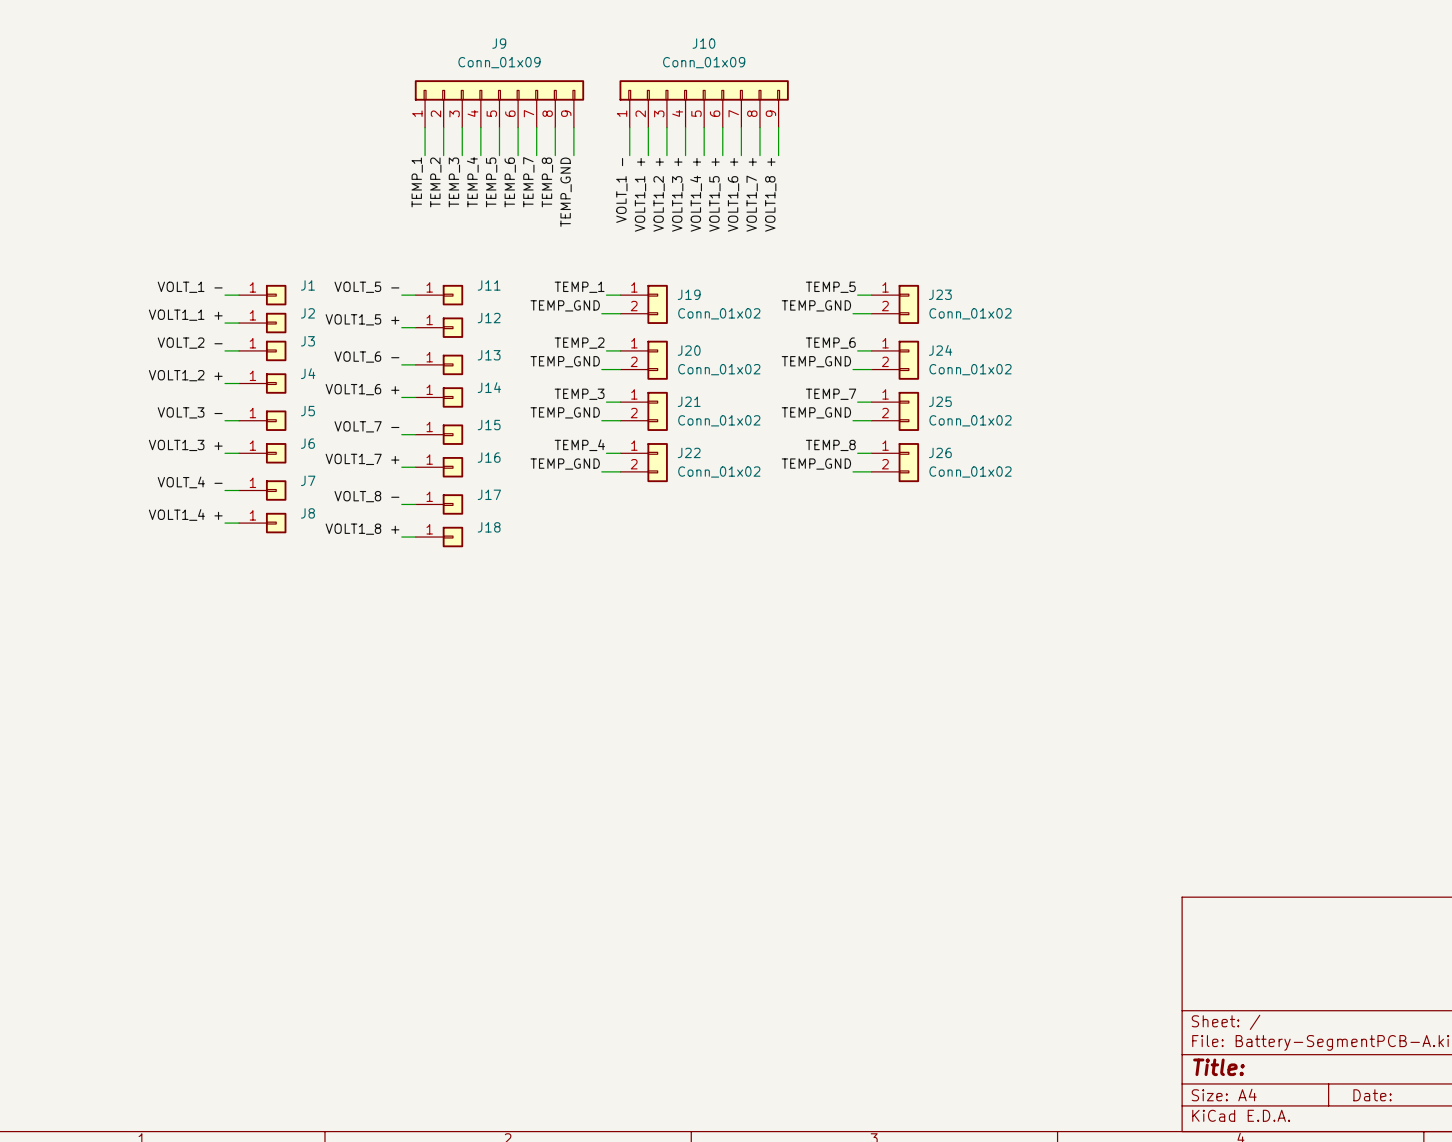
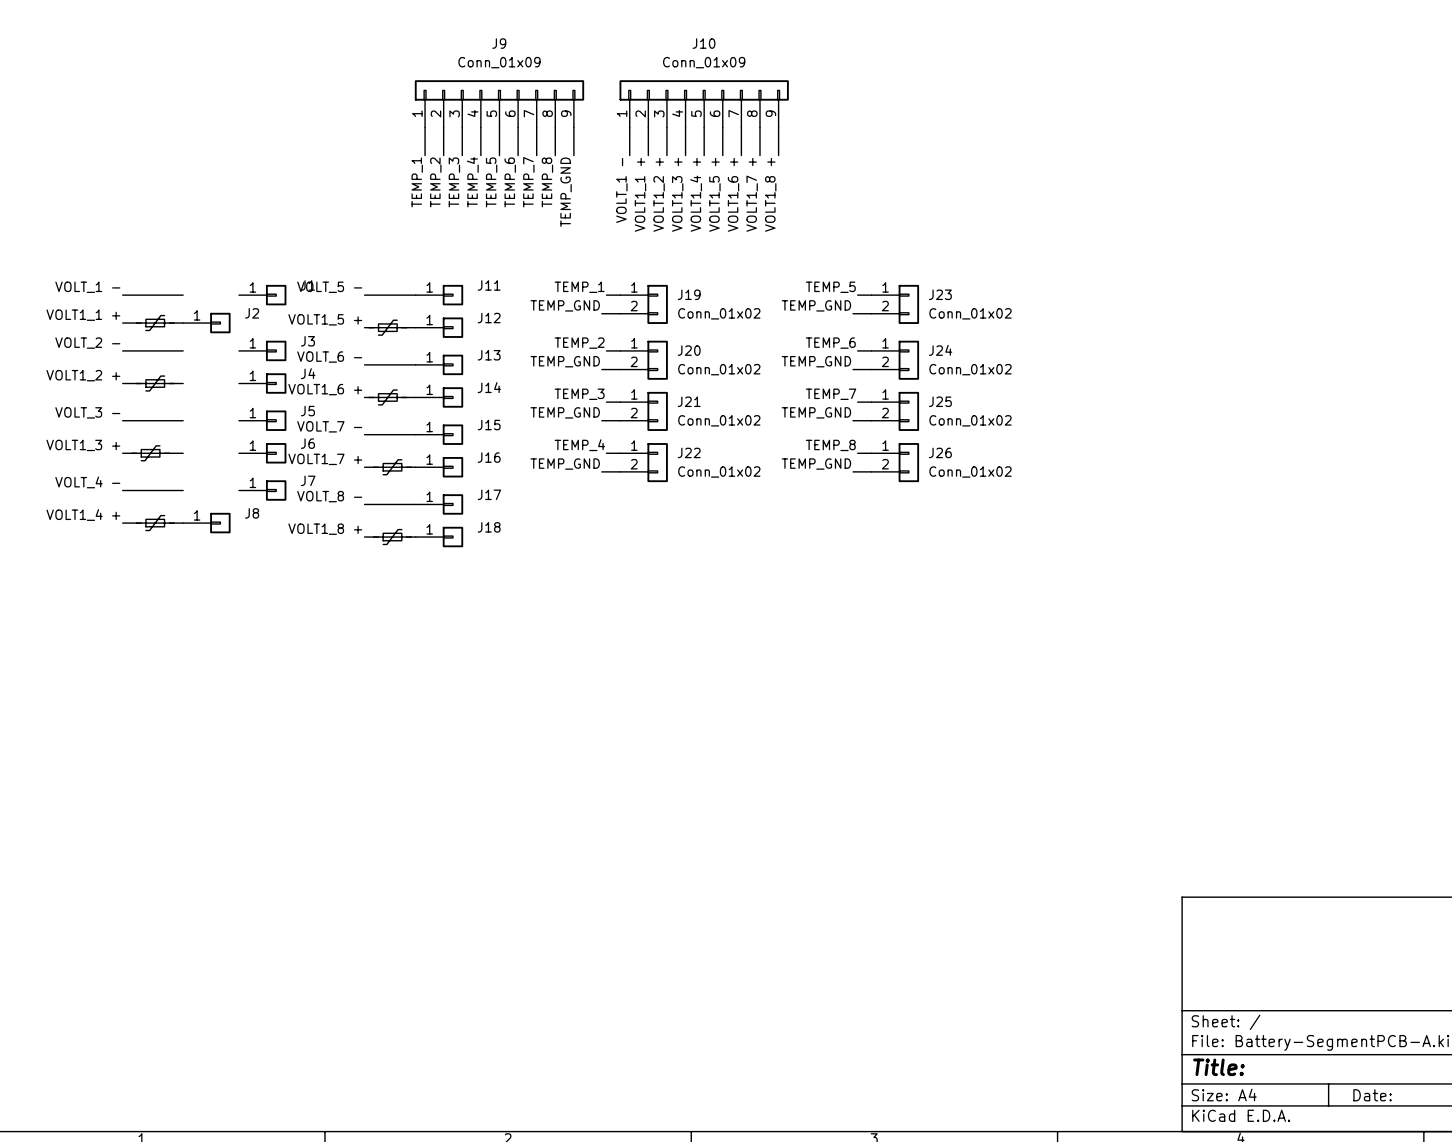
label position: VOLT_1 - (190, 287) -> VOLT_1 - (87, 287)
label position: VOLT_5 - (366, 287) -> VOLT_5 - (329, 287)
wire: none -> (122, 295) (183, 295)
wire: (225, 295) (238, 295) -> none
wire: none -> (364, 295) (401, 295)
label position: VOLT1_1 + (185, 315) -> VOLT1_1 + (83, 315)
label position: VOLT1_5 + (362, 319) -> VOLT1_5 + (325, 319)
part: none -> (155, 323)
wire: none -> (173, 323) (183, 323)
wire: (225, 323) (238, 323) -> (122, 323) (136, 323)
J2 position: (262, 323) -> (206, 323)
part: none -> (387, 327)
label position: VOLT_2 - (190, 343) -> VOLT_2 - (87, 343)
wire: none -> (122, 350) (183, 350)
wire: (225, 350) (238, 350) -> none
label position: VOLT_6 - (366, 357) -> VOLT_6 - (329, 357)
wire: none -> (364, 364) (401, 364)
label position: VOLT1_2 + (185, 375) -> VOLT1_2 + (83, 375)
part: none -> (155, 383)
wire: none -> (173, 383) (183, 383)
wire: (225, 383) (238, 383) -> (122, 383) (136, 383)
label position: VOLT1_6 + (362, 389) -> VOLT1_6 + (325, 389)
part: none -> (387, 397)
label position: VOLT_3 - (190, 412) -> VOLT_3 - (87, 412)
wire: none -> (122, 420) (183, 420)
wire: (225, 420) (238, 420) -> none
label position: VOLT_7 - (366, 426) -> VOLT_7 - (329, 426)
wire: none -> (364, 434) (401, 434)
label position: VOLT1_3 + (185, 445) -> VOLT1_3 + (83, 445)
wire: none -> (122, 453) (131, 453)
part: none -> (150, 453)
wire: (225, 453) (238, 453) -> (169, 453) (183, 453)
label position: VOLT1_7 + (362, 459) -> VOLT1_7 + (325, 459)
part: none -> (392, 467)
label position: VOLT_4 - (190, 482) -> VOLT_4 - (87, 482)
wire: none -> (122, 490) (183, 490)
wire: (225, 490) (238, 490) -> none
label position: VOLT_8 - (366, 496) -> VOLT_8 - (329, 496)
wire: none -> (364, 504) (401, 504)
label position: VOLT1_4 + (185, 514) -> VOLT1_4 + (83, 514)
part: none -> (155, 523)
wire: none -> (173, 523) (183, 523)
wire: (225, 523) (238, 523) -> (122, 523) (136, 523)
J8 position: (262, 523) -> (206, 523)
label position: VOLT1_8 + (362, 529) -> VOLT1_8 + (325, 529)
part: none -> (392, 537)

